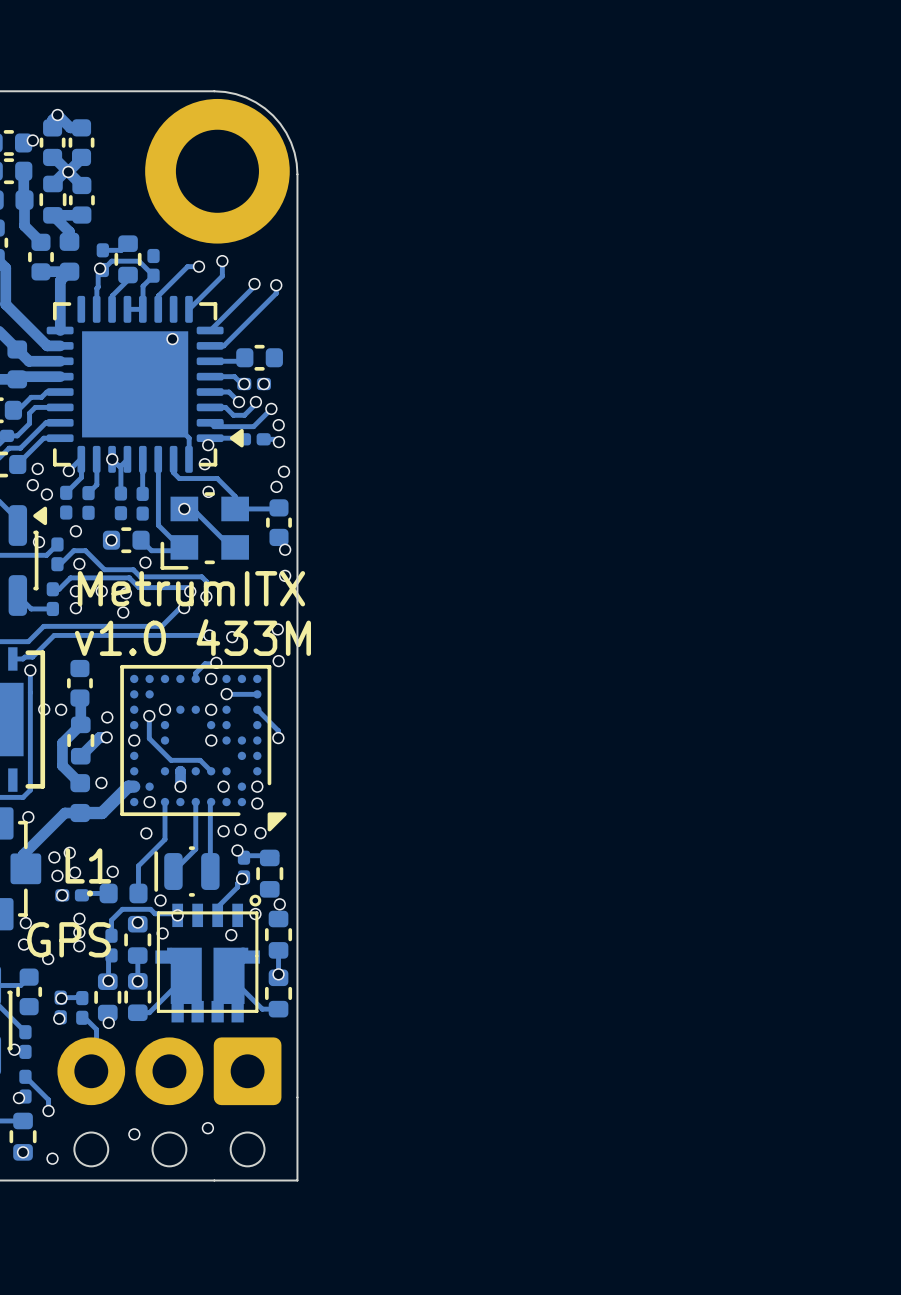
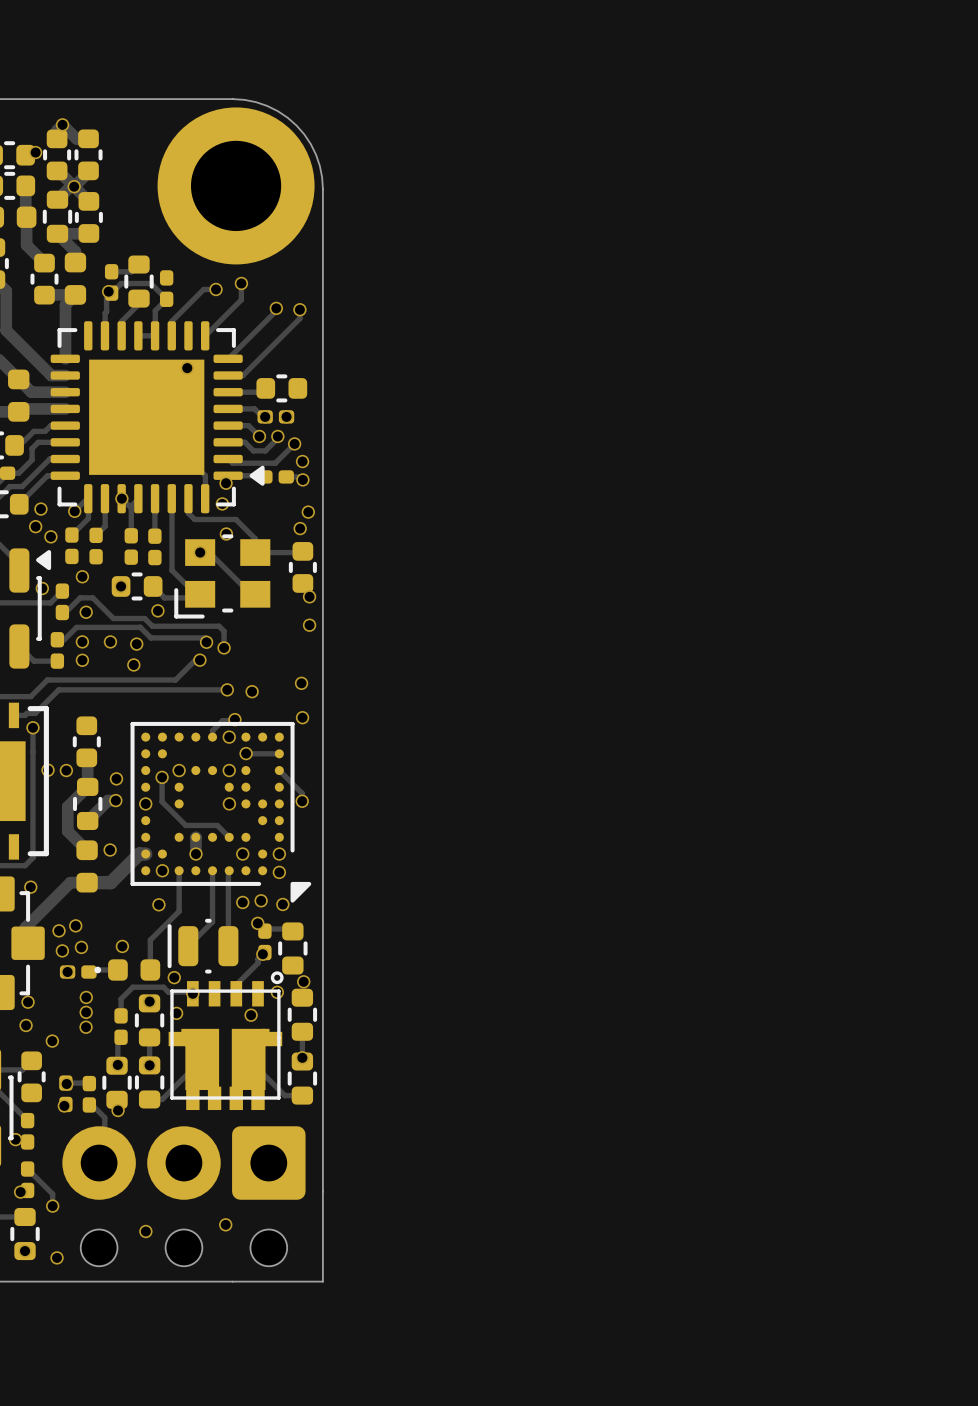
text: MetrumITX (191, 588) -> none
text: v1.0 433M (192, 637) -> none
text: L1 (88, 865) -> none
text: GPS (68, 939) -> none

